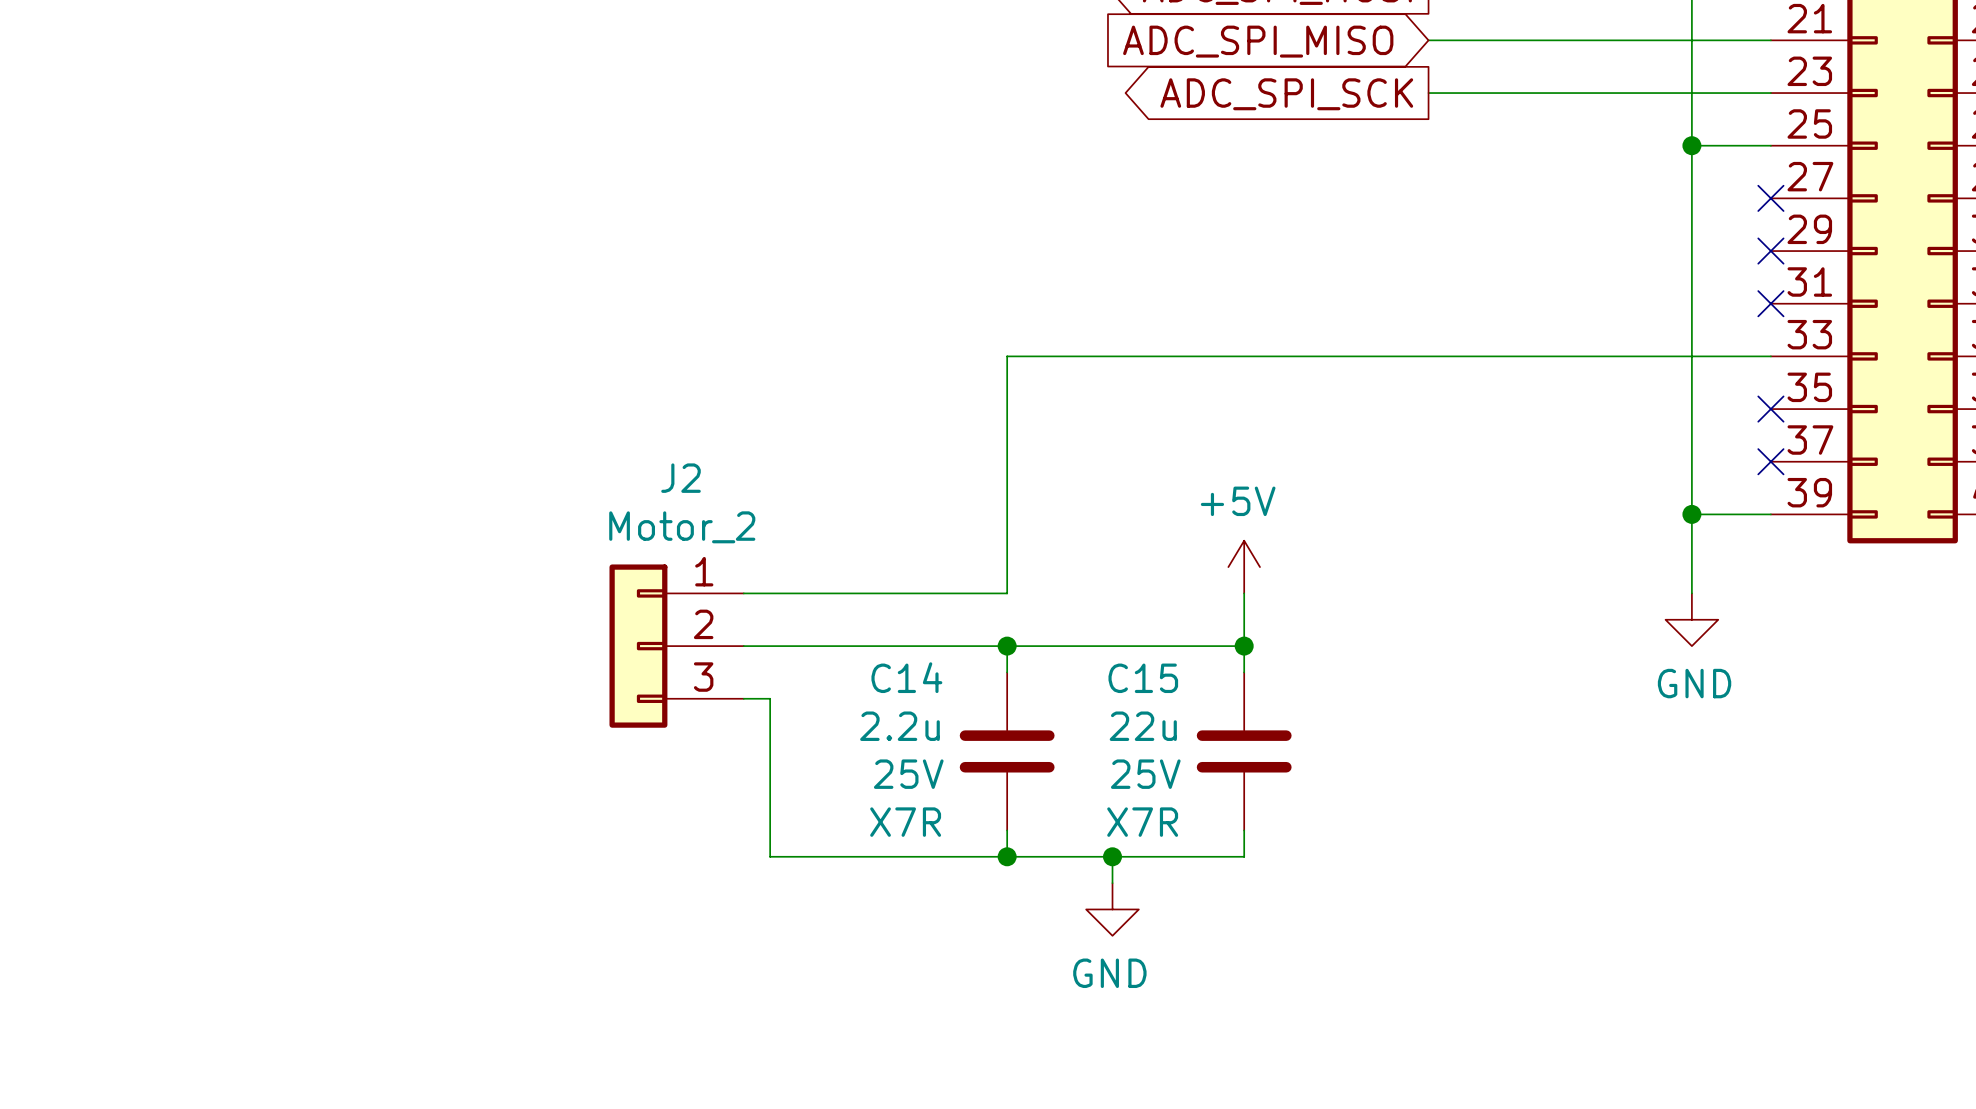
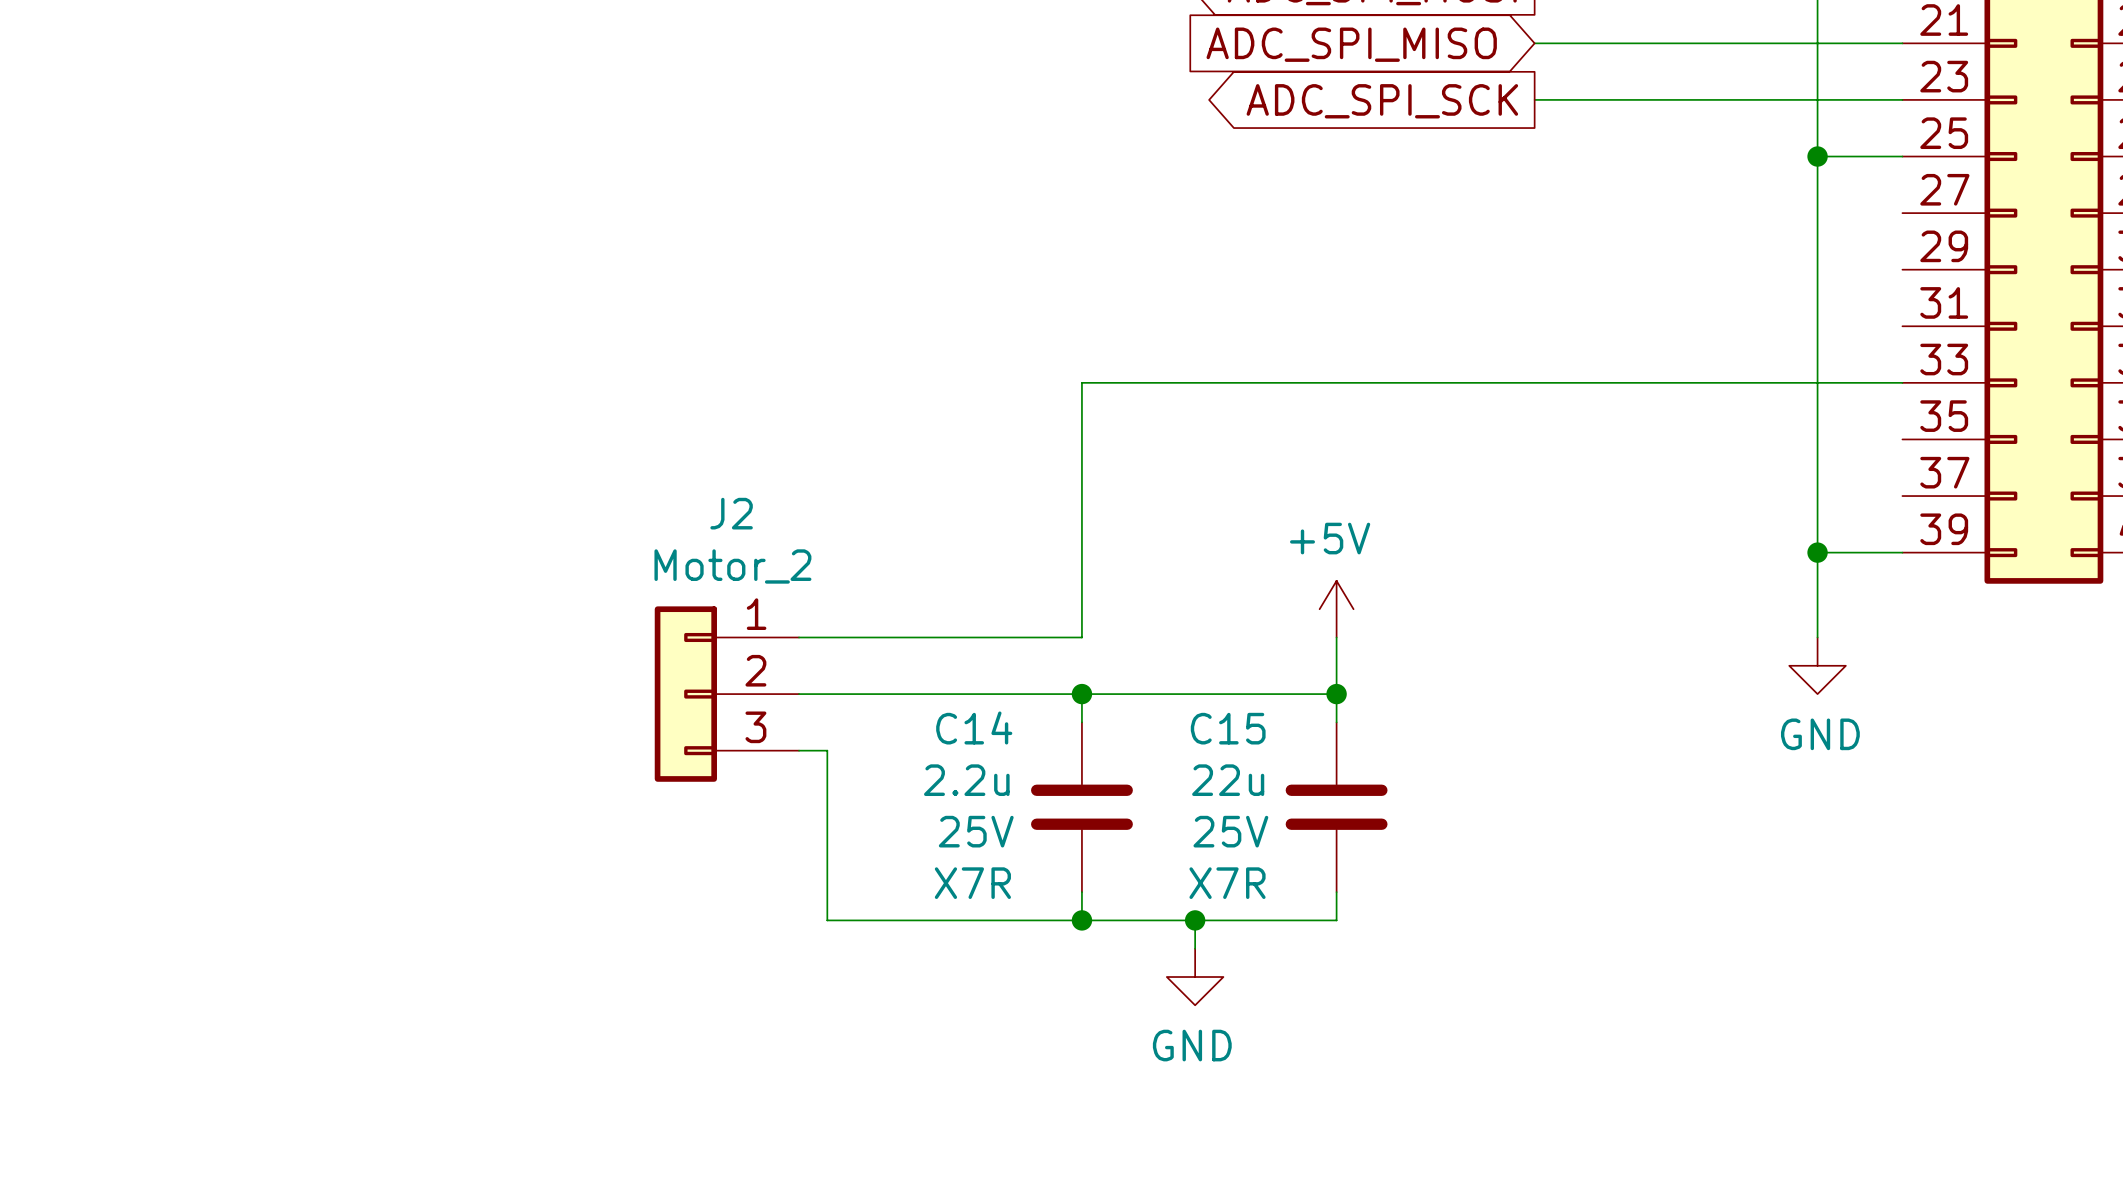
no-connect mark: (1770, 198) -> none
no-connect mark: (1770, 251) -> none
no-connect mark: (1770, 303) -> none
no-connect mark: (1770, 409) -> none
no-connect mark: (1770, 461) -> none

